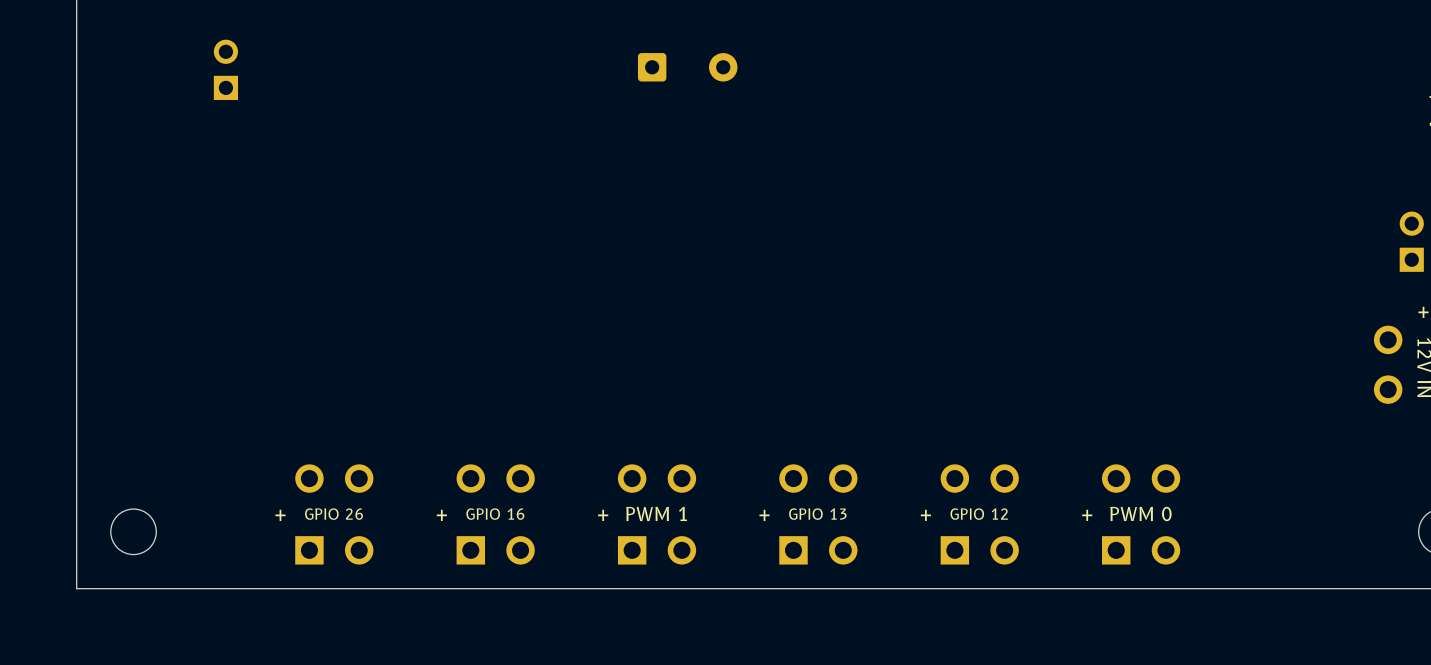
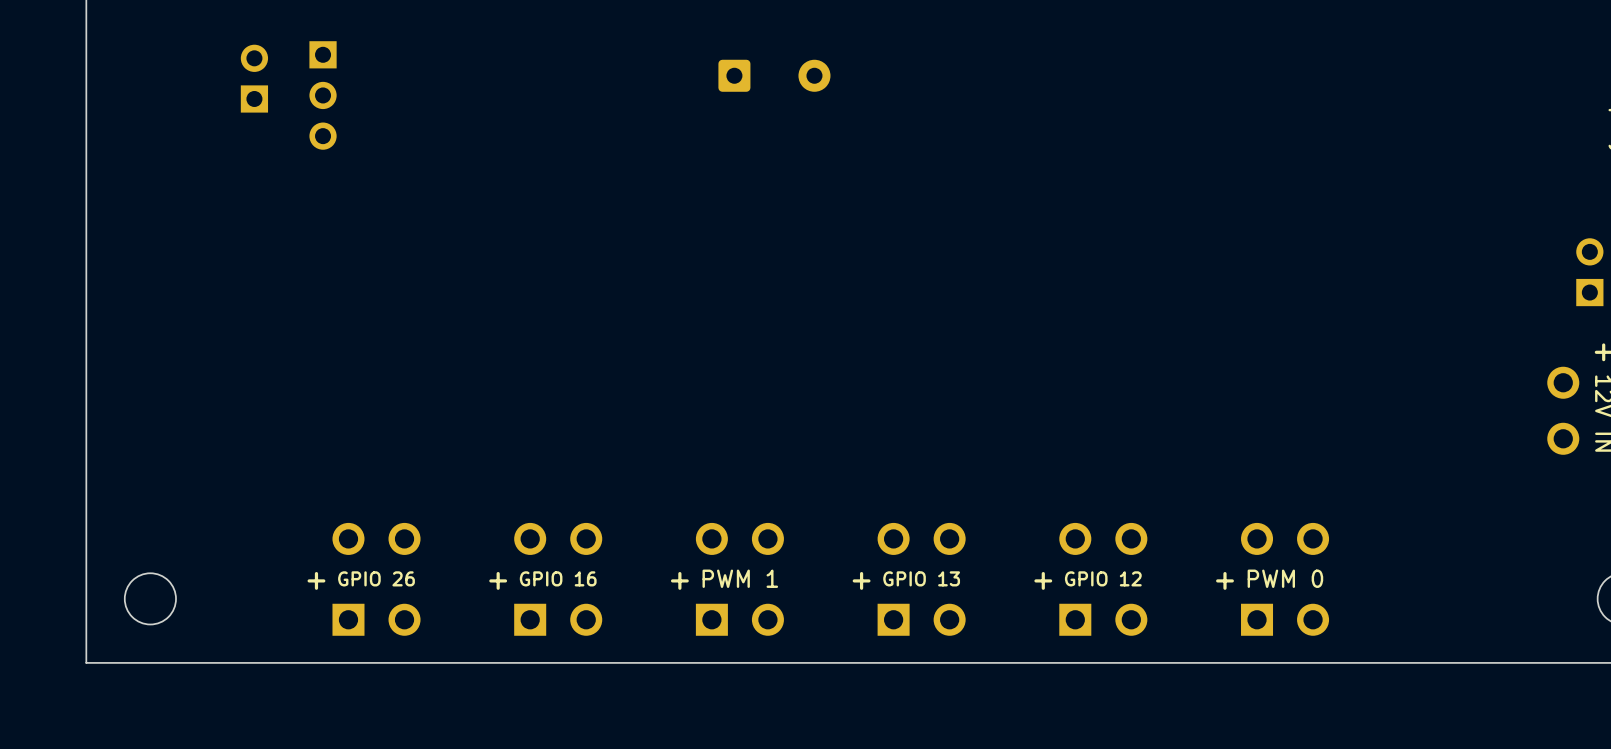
part: none -> (323, 95)

